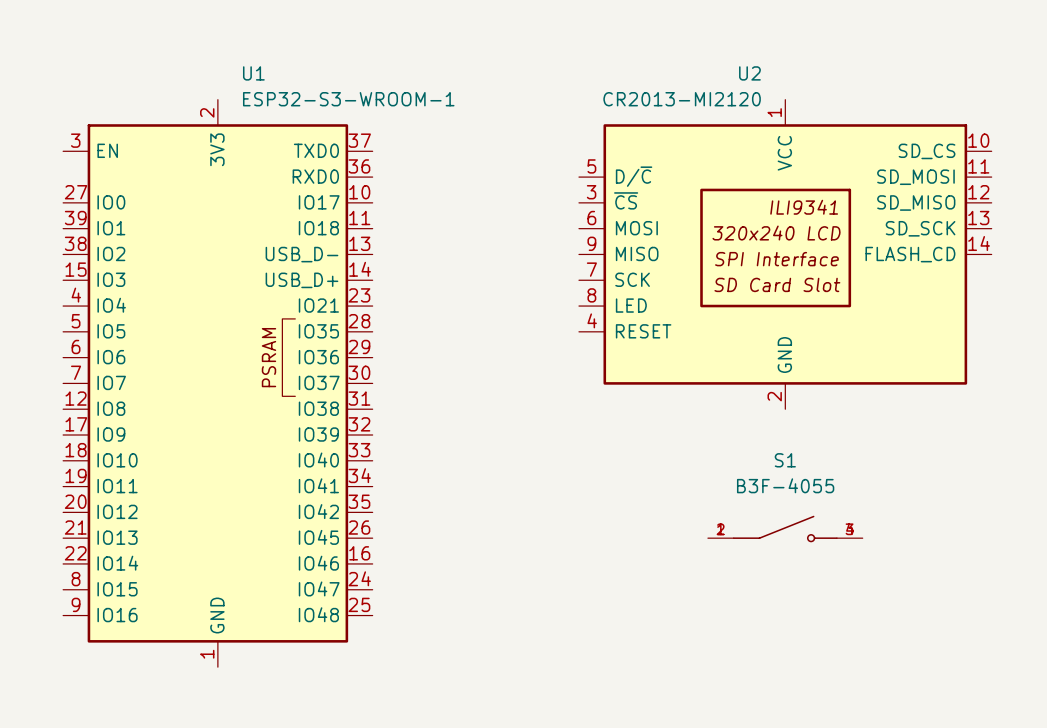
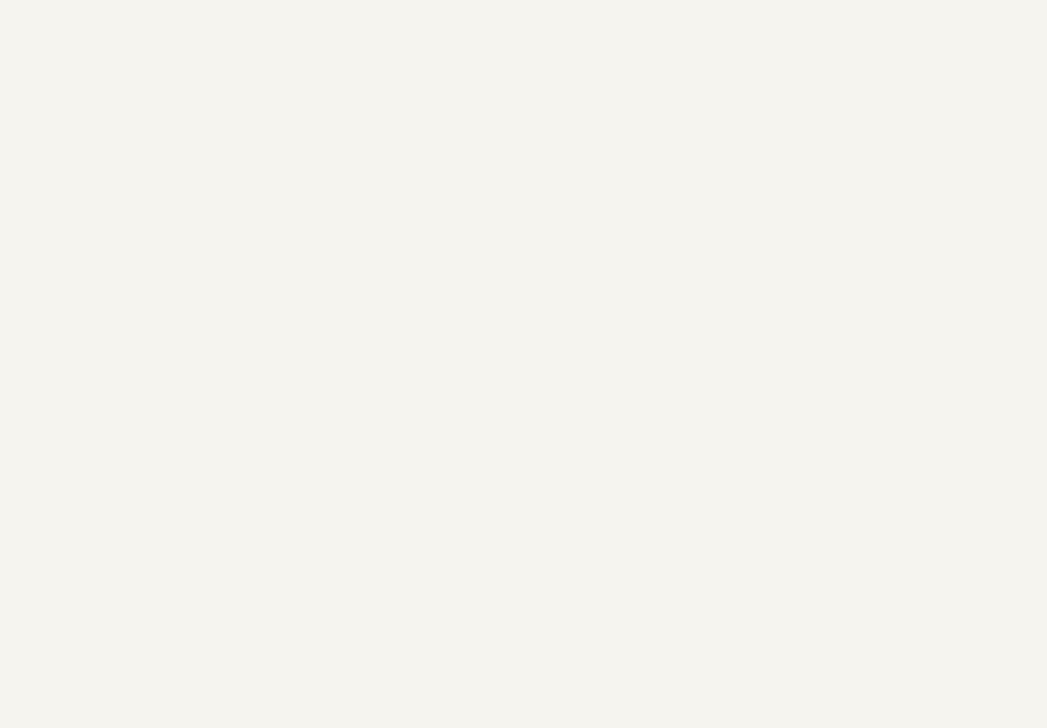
U2: CR2013-MI2120 (785, 254) -> none
U1: ESP32-S3-WROOM-1 (217, 383) -> none
S1: B3F-4055 (785, 529) -> none

